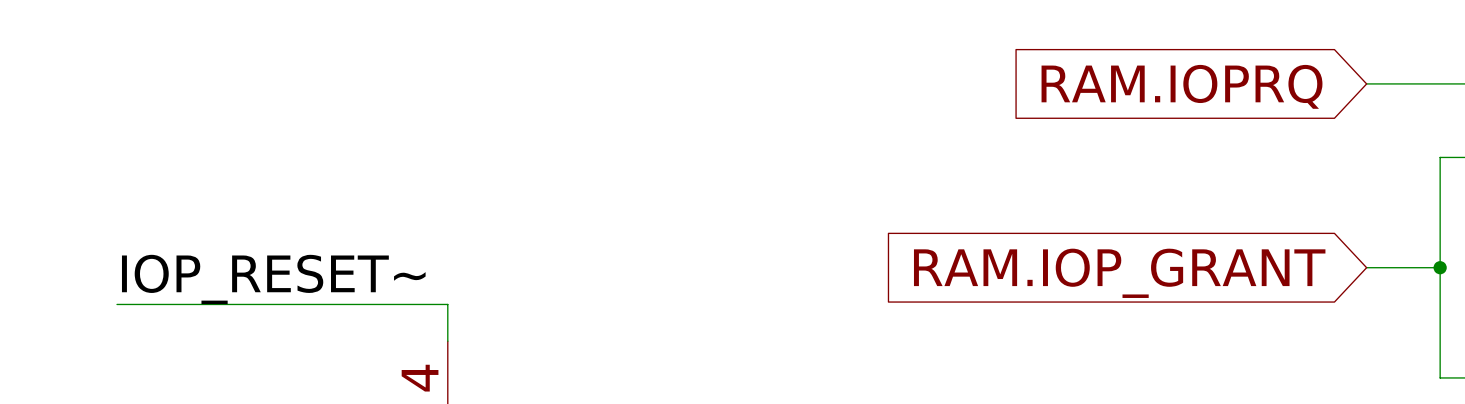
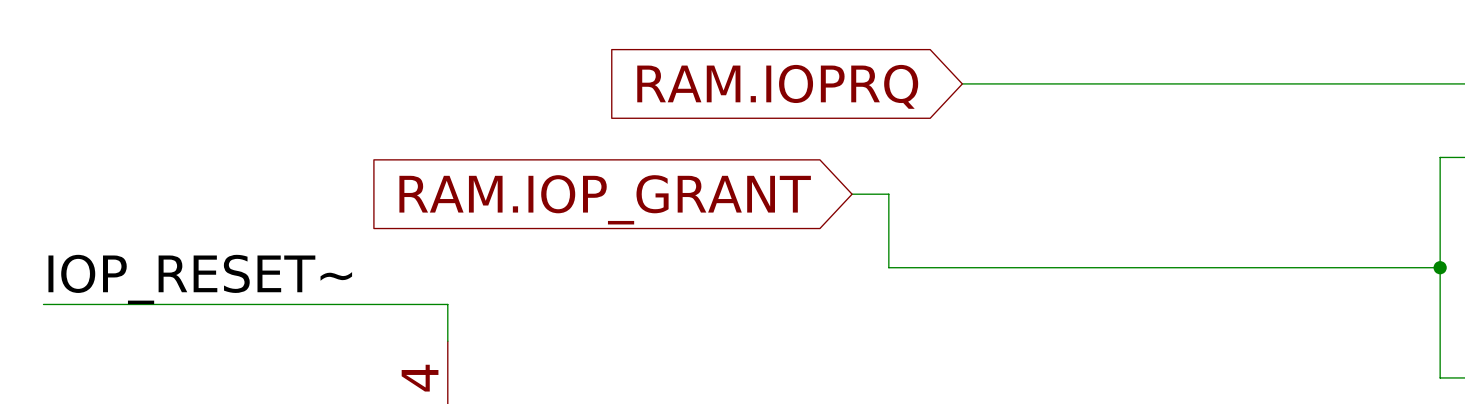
wire: none -> (962, 83) (1366, 83)
global label: none -> RAM.IOPRQ (777, 86)
global label: RAM.IOPRQ (1182, 86) -> none
wire: none -> (852, 194) (888, 194) (888, 267) (1366, 267)
global label: none -> RAM.IOP_GRANT (605, 199)
global label: RAM.IOP_GRANT (1119, 273) -> none
label position: IOP_RESET~ (273, 279) -> IOP_RESET~ (200, 279)
wire: none -> (43, 304) (117, 304)

